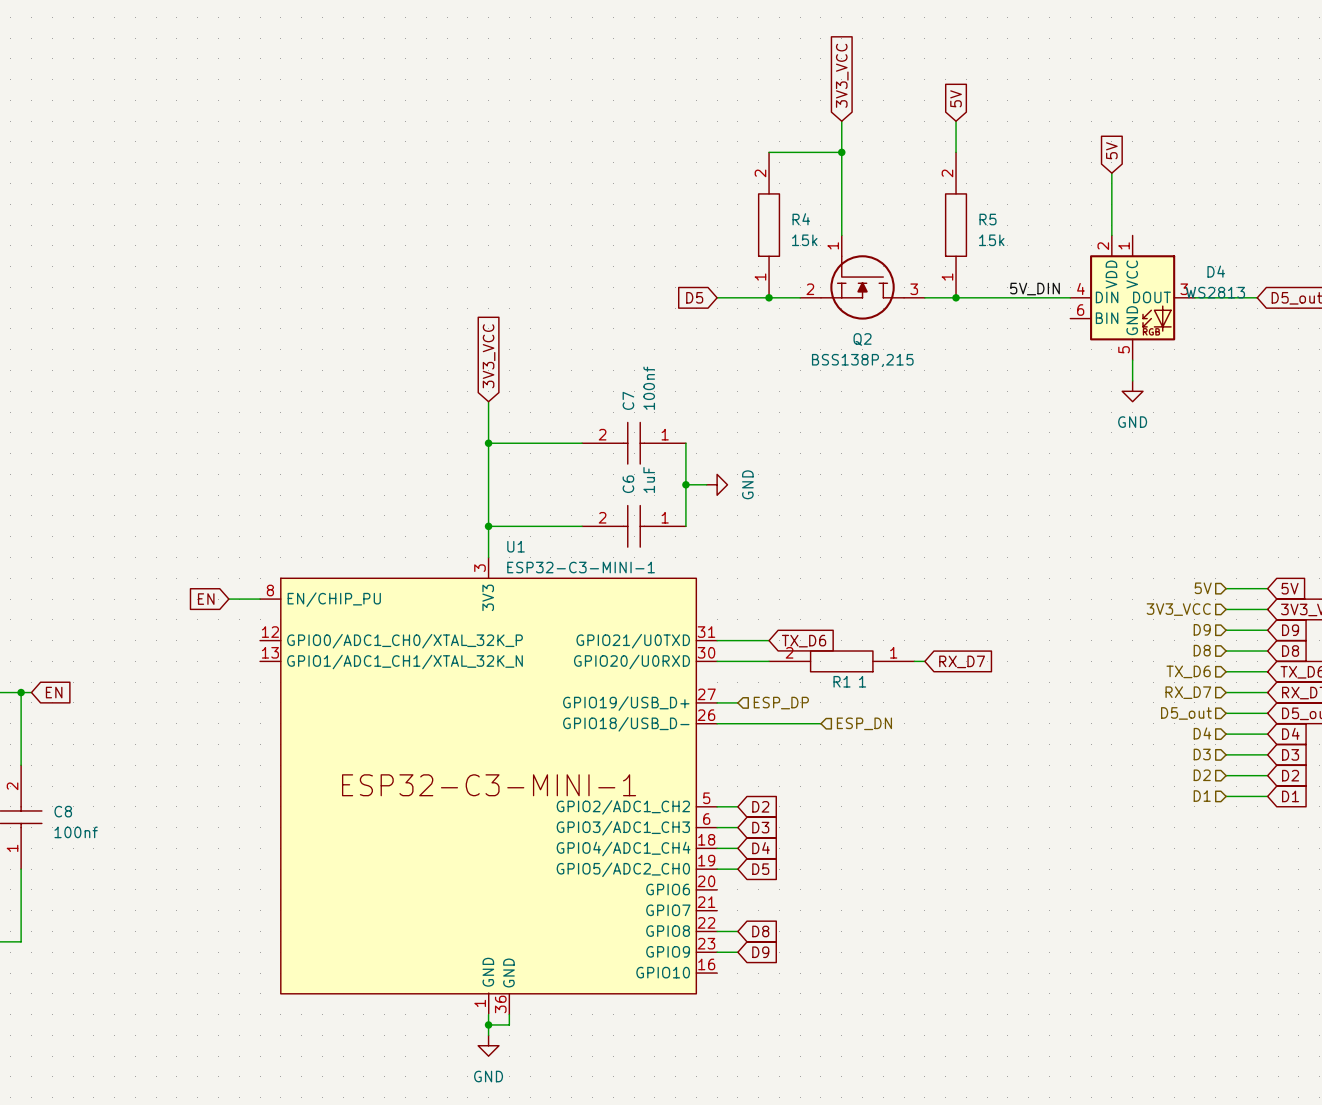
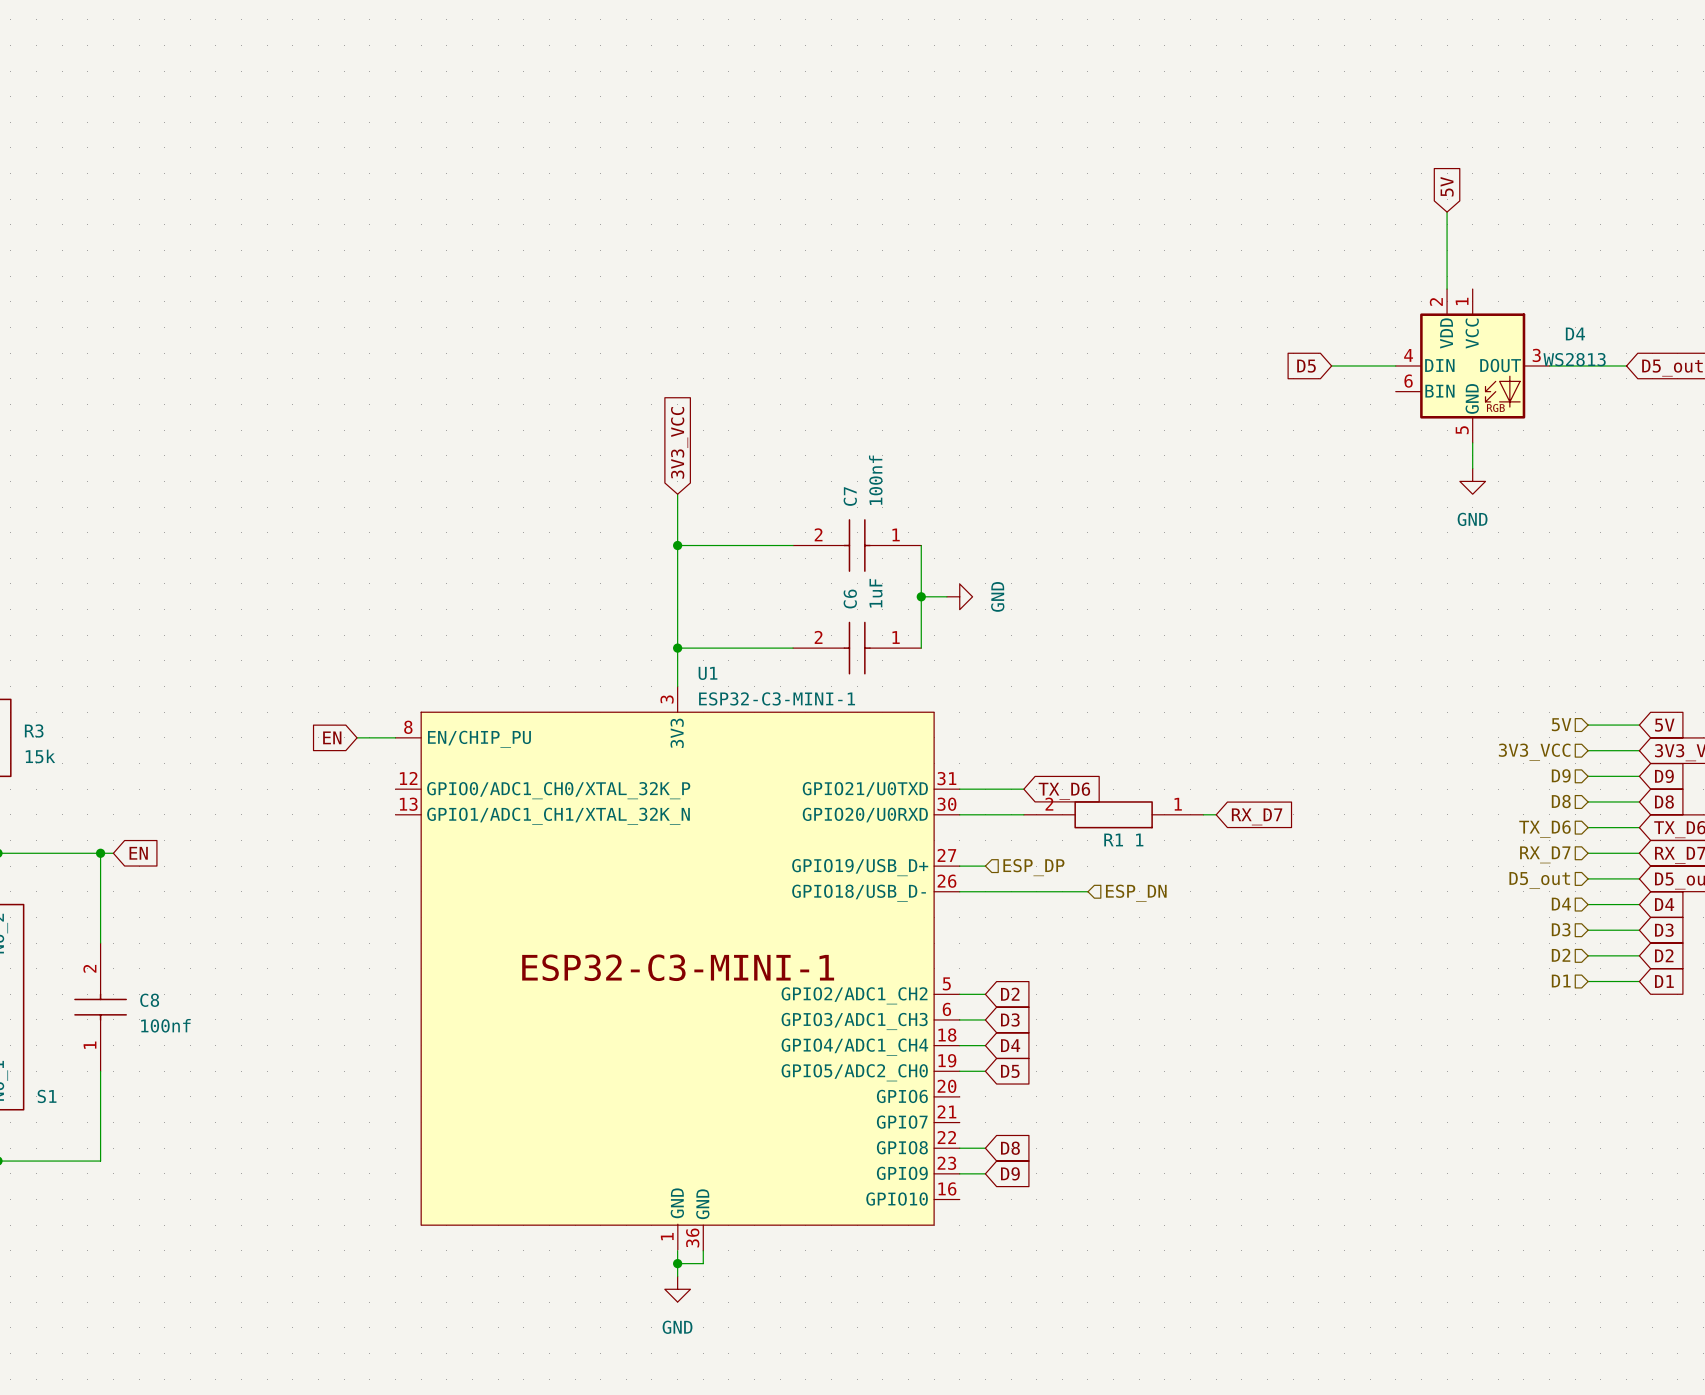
global label: 3V3_VCC (842, 75) -> none
global label: 5V (956, 98) -> none
wire: (841, 121) (841, 235) -> none
wire: (956, 121) (956, 152) -> none
wire: (769, 152) (841, 152) -> none
junction: (841, 152) -> none
R4: 15k (769, 225) -> none
R5: 15k (956, 225) -> none
Q2: BSS138P,215 (862, 277) -> none
label: 5V_DIN (1035, 289) -> none
global label: D5 (694, 297) -> none
wire: (717, 297) (800, 297) -> none
junction: (769, 297) -> none
wire: (924, 297) (1018, 297) -> none
junction: (956, 297) -> none
global label: none -> D5 (1306, 366)

